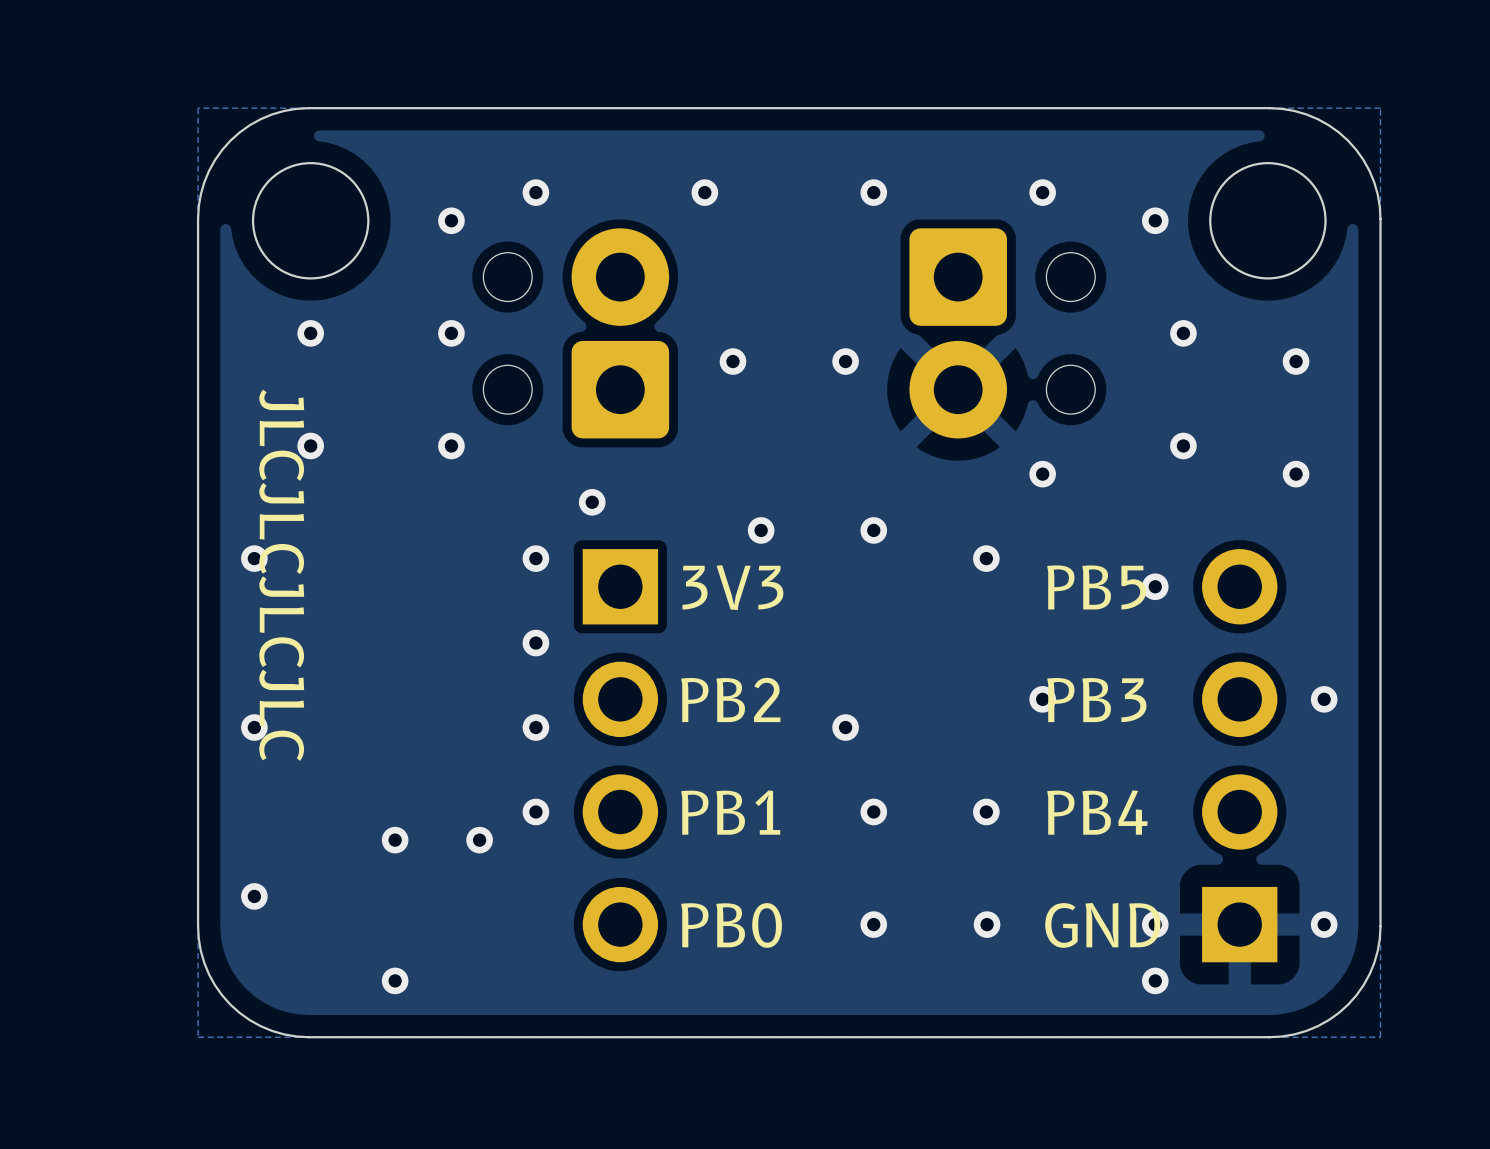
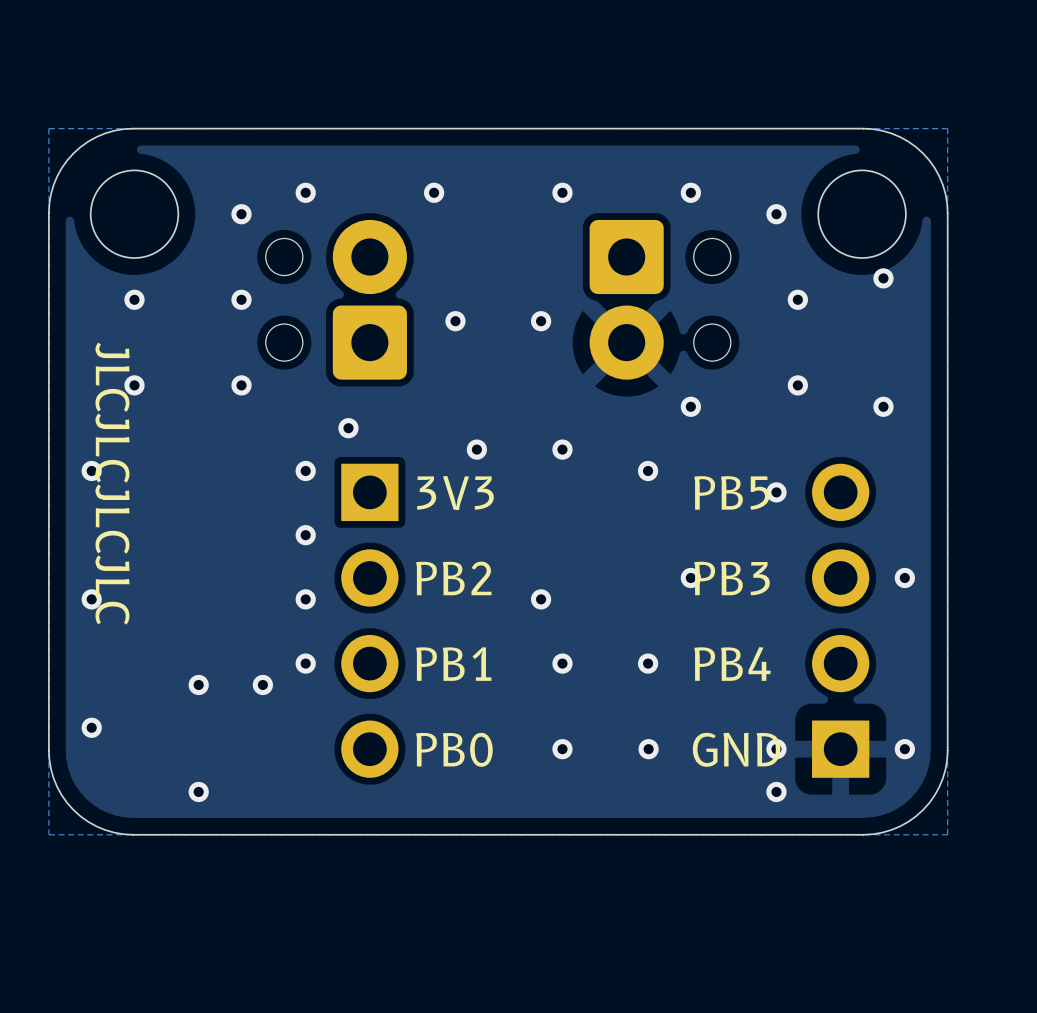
via position: (1296, 361) -> (883, 278)

